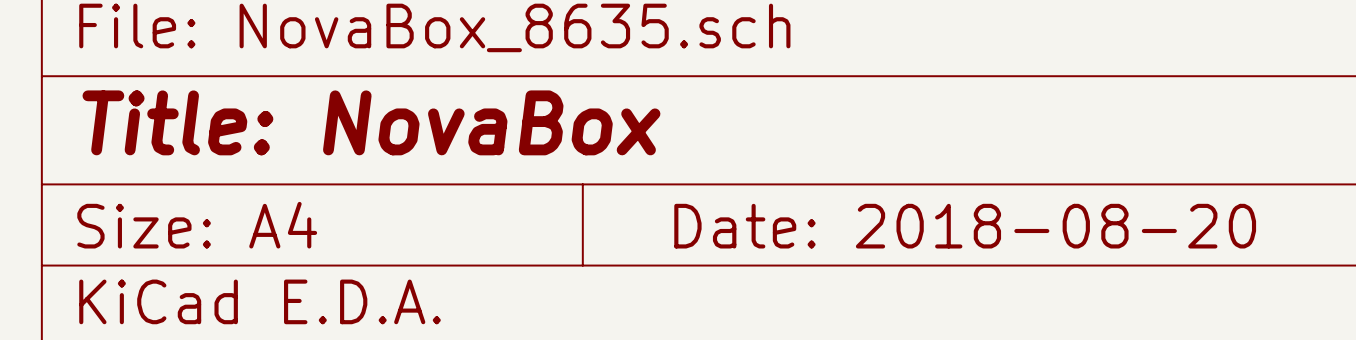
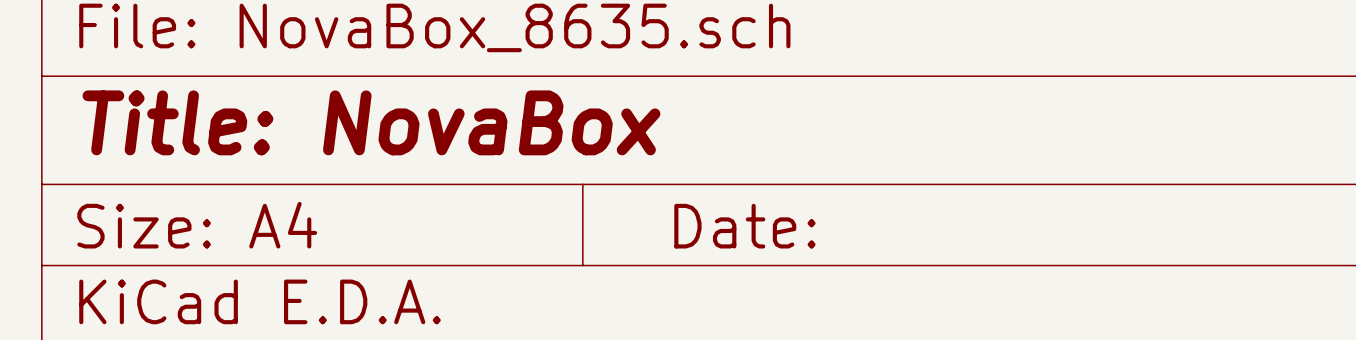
title block: Date: 2018-08-20 (965, 226) -> Date: (744, 226)

